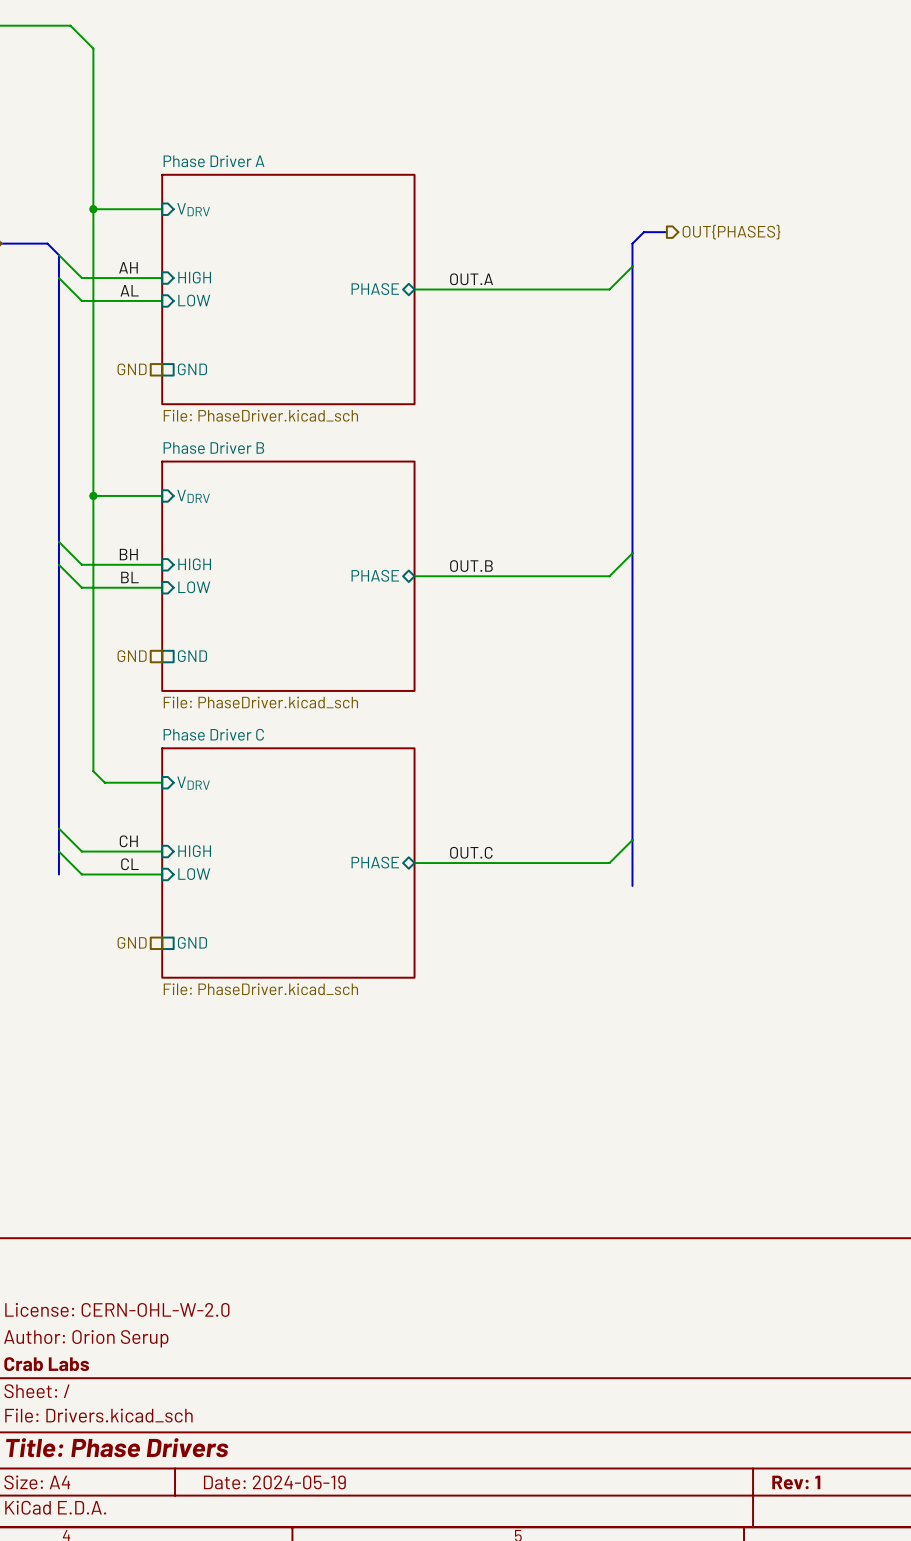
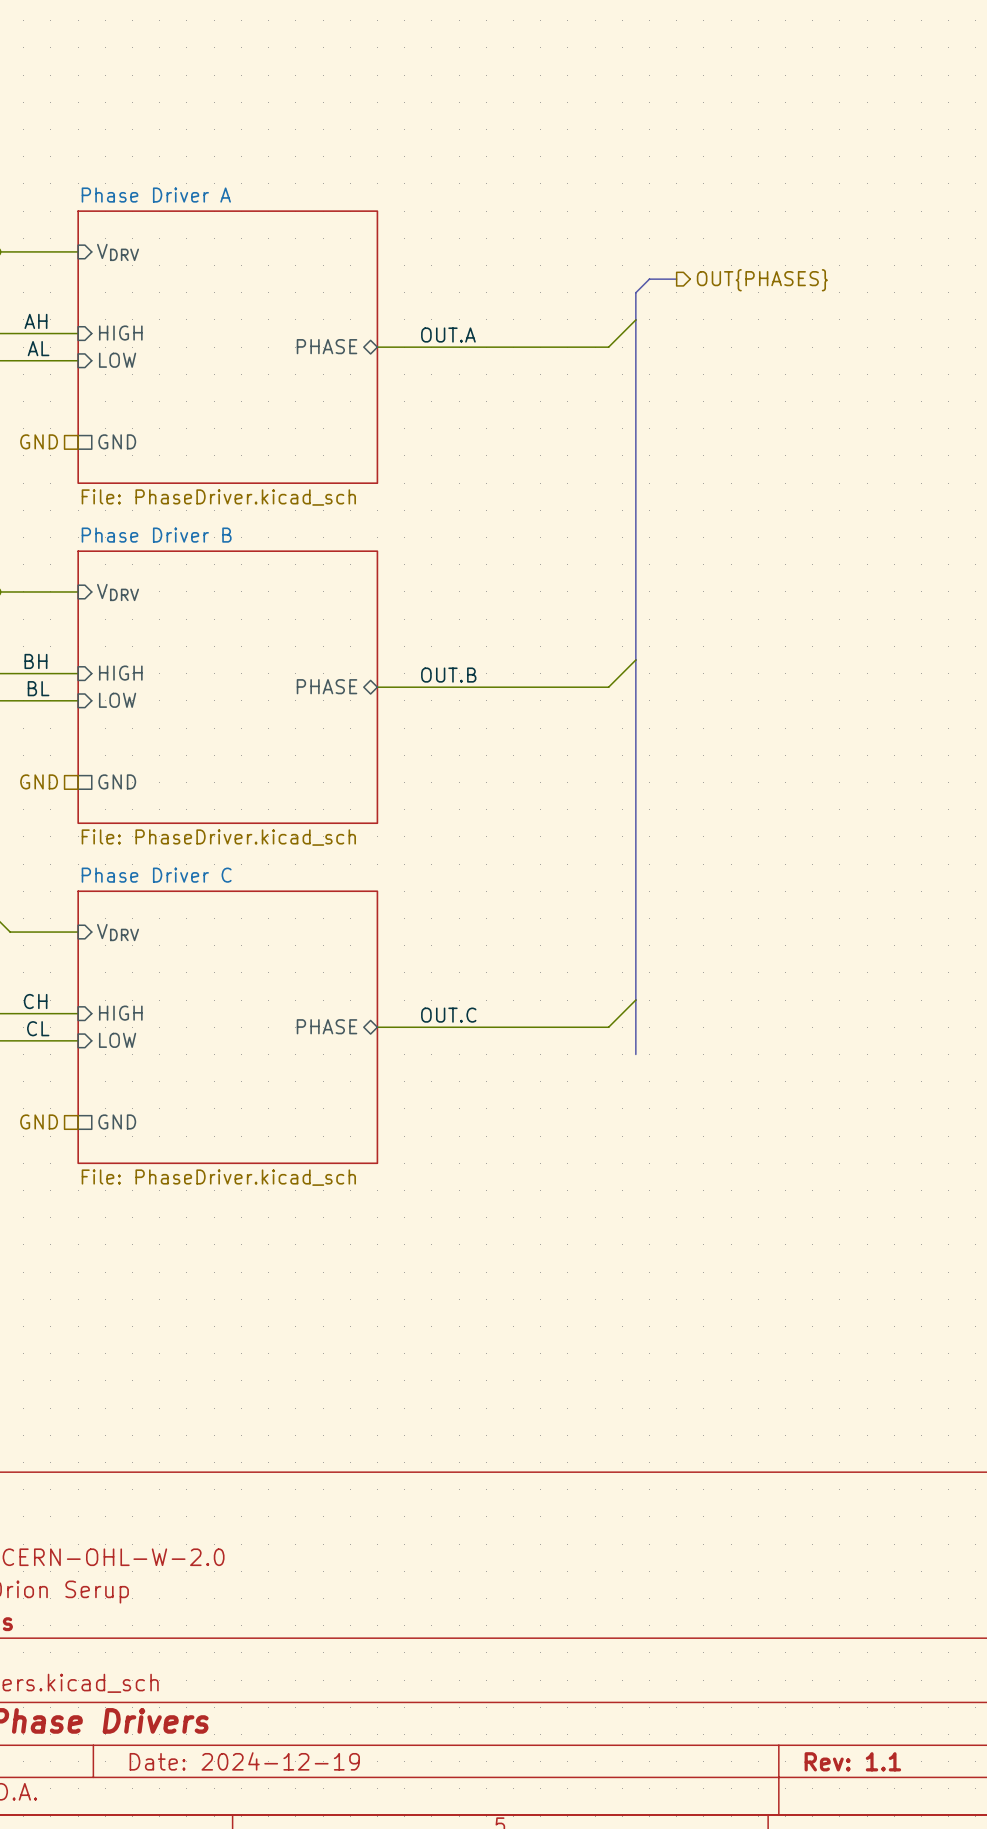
title block: Date: 2024-05-19 (274, 1482) -> Date: 2024-12-19 (244, 1761)
title block: Rev: 1 (796, 1482) -> Rev: 1.1 (852, 1761)

